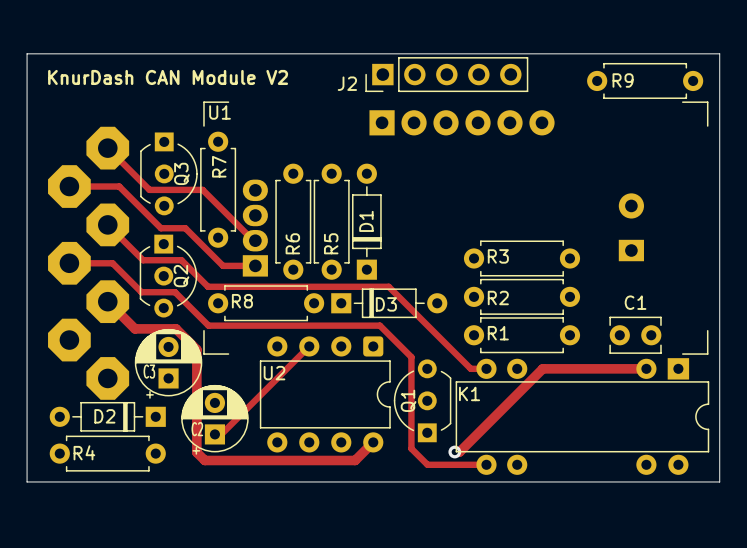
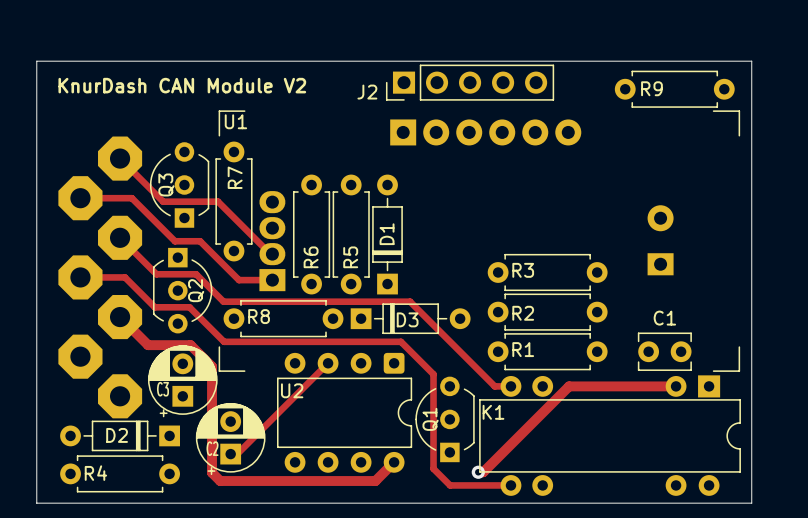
Q3 rotation: 0° (168, 173) -> 180° (179, 184)

